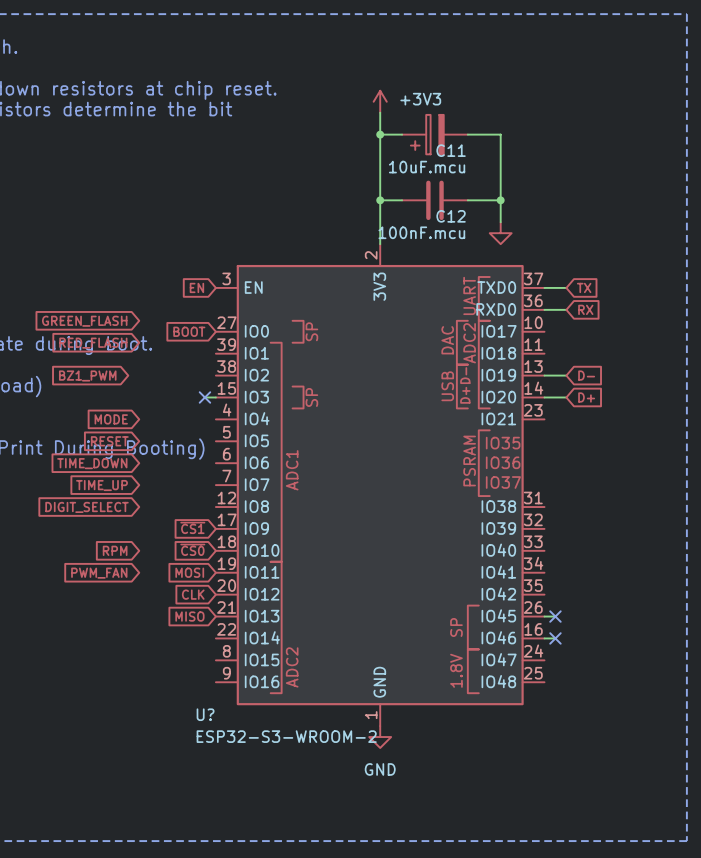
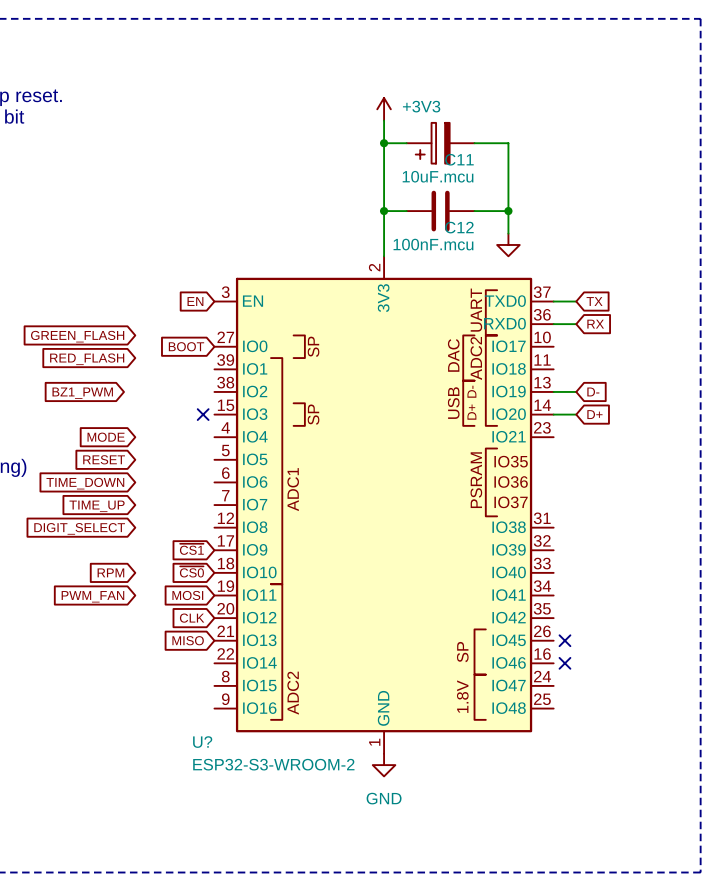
wire: (204, 397) (215, 397) -> none
wire: (544, 616) (555, 616) -> none
wire: (544, 638) (555, 638) -> none

